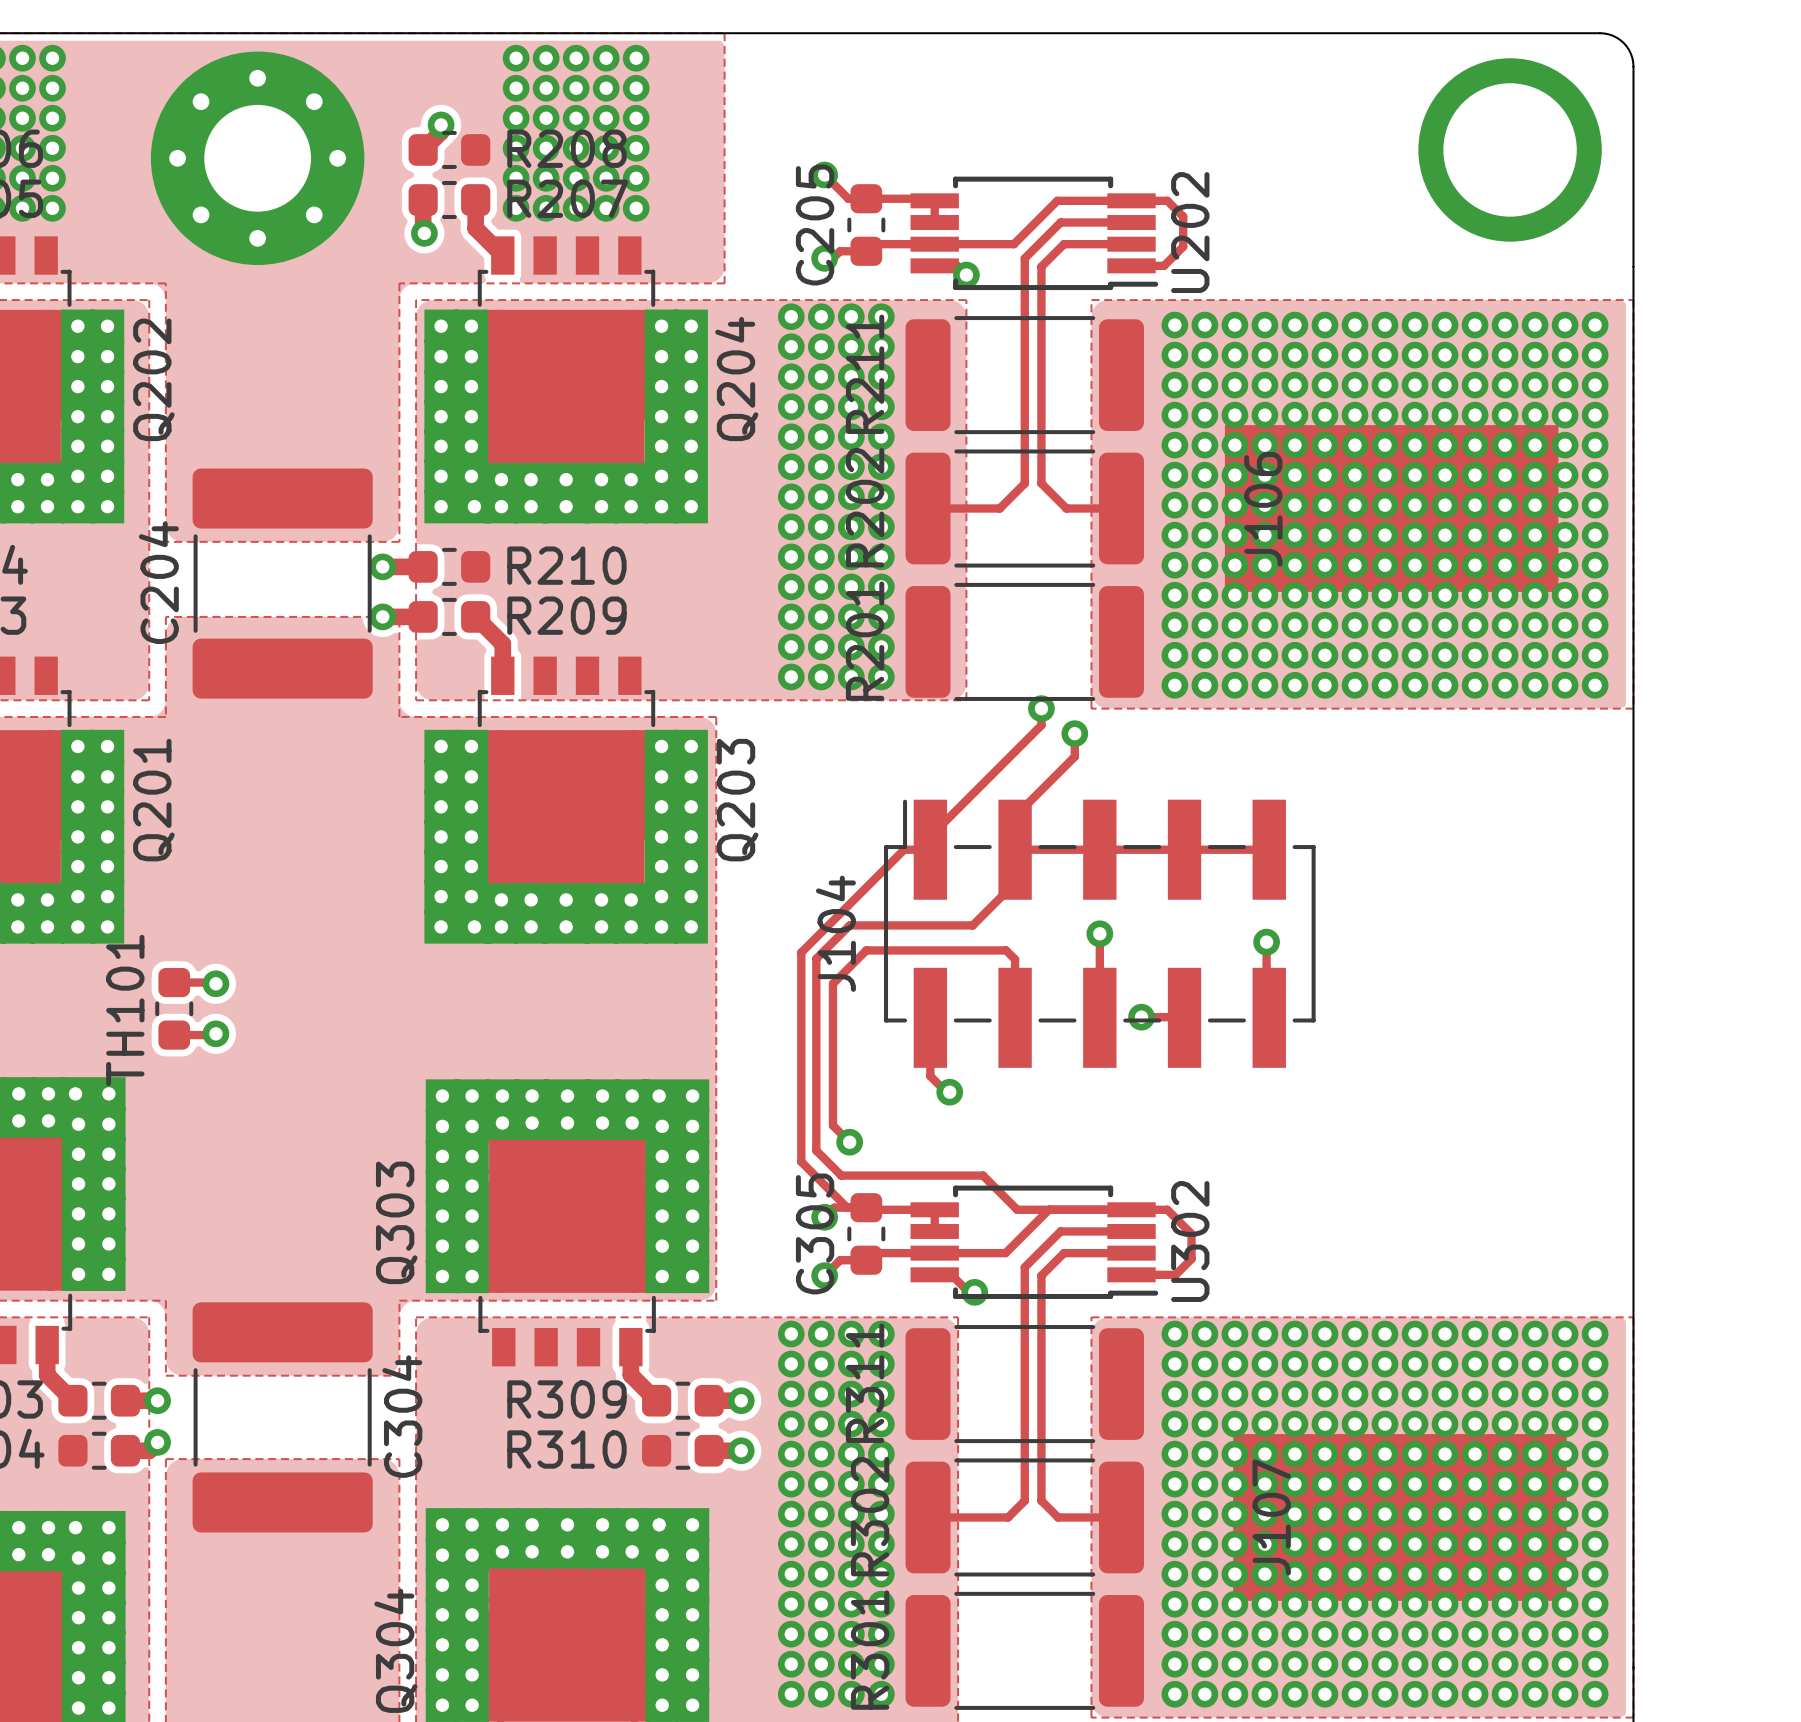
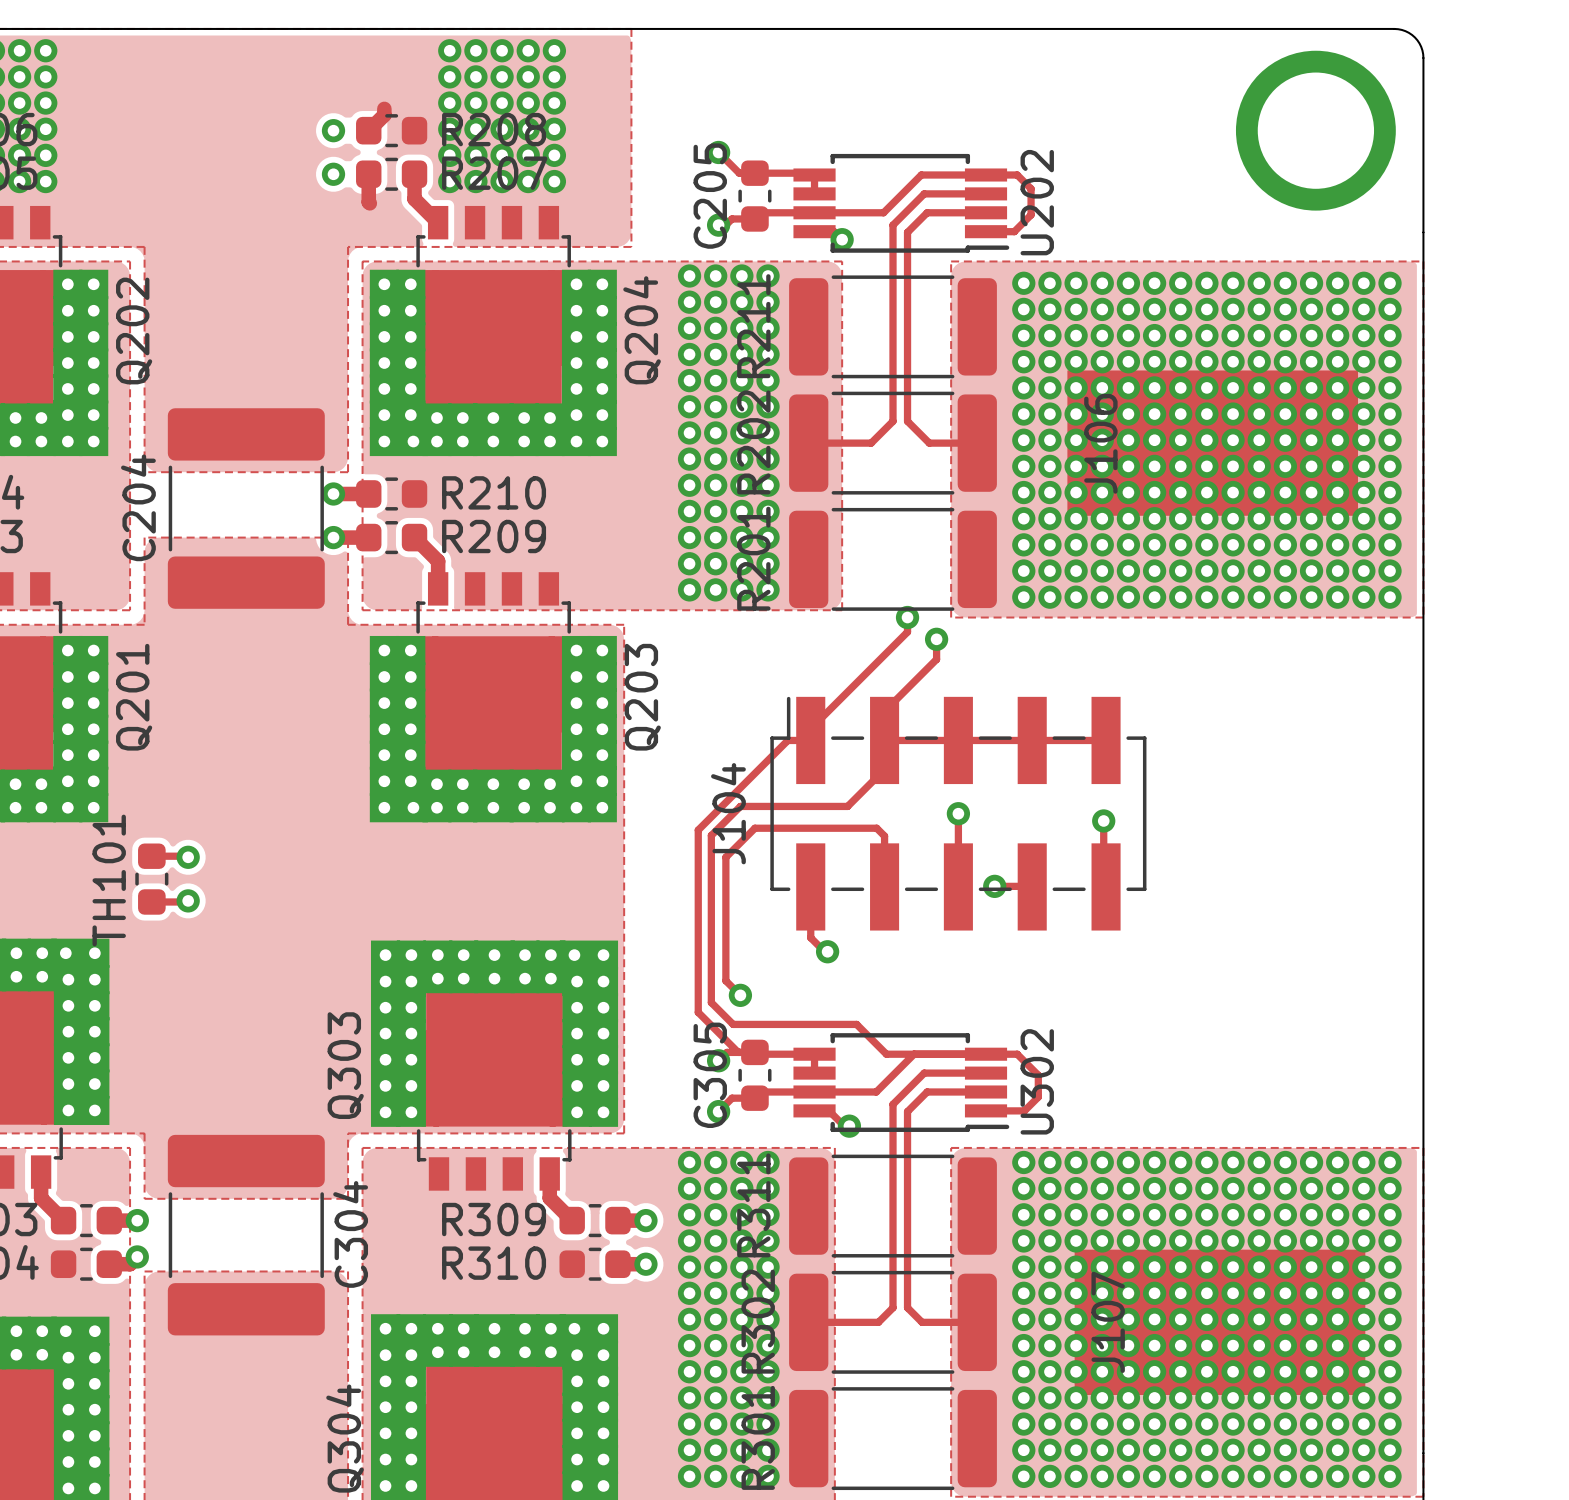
via: (441, 124) -> none
via: none -> (333, 130)
part: (257, 158) -> none
via: none -> (333, 174)
via: (424, 233) -> none

